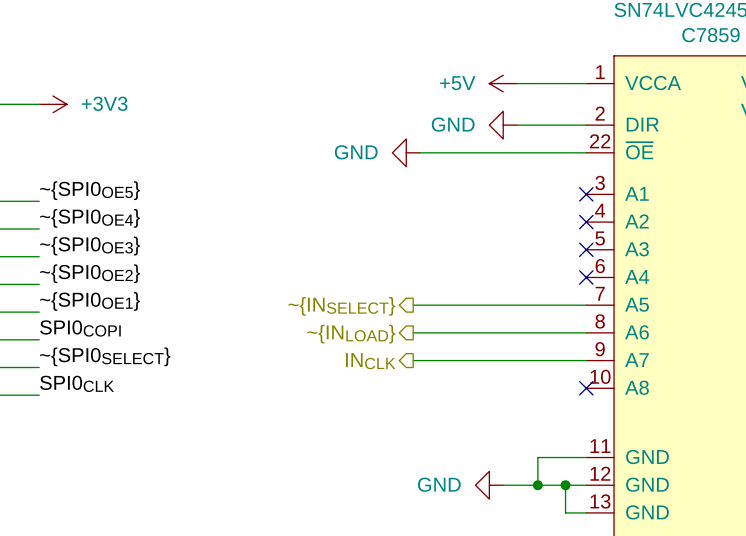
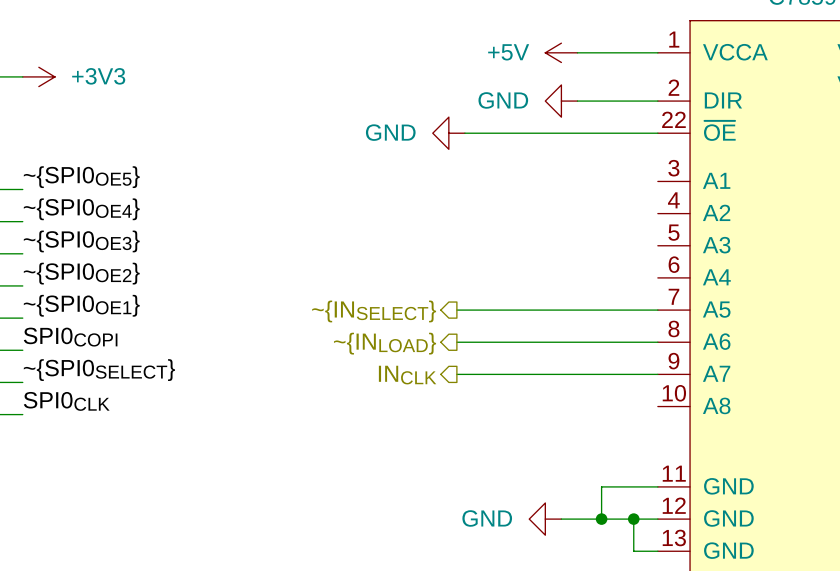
no-connect mark: (586, 194) -> none
no-connect mark: (586, 222) -> none
no-connect mark: (586, 249) -> none
no-connect mark: (586, 277) -> none
no-connect mark: (586, 388) -> none

